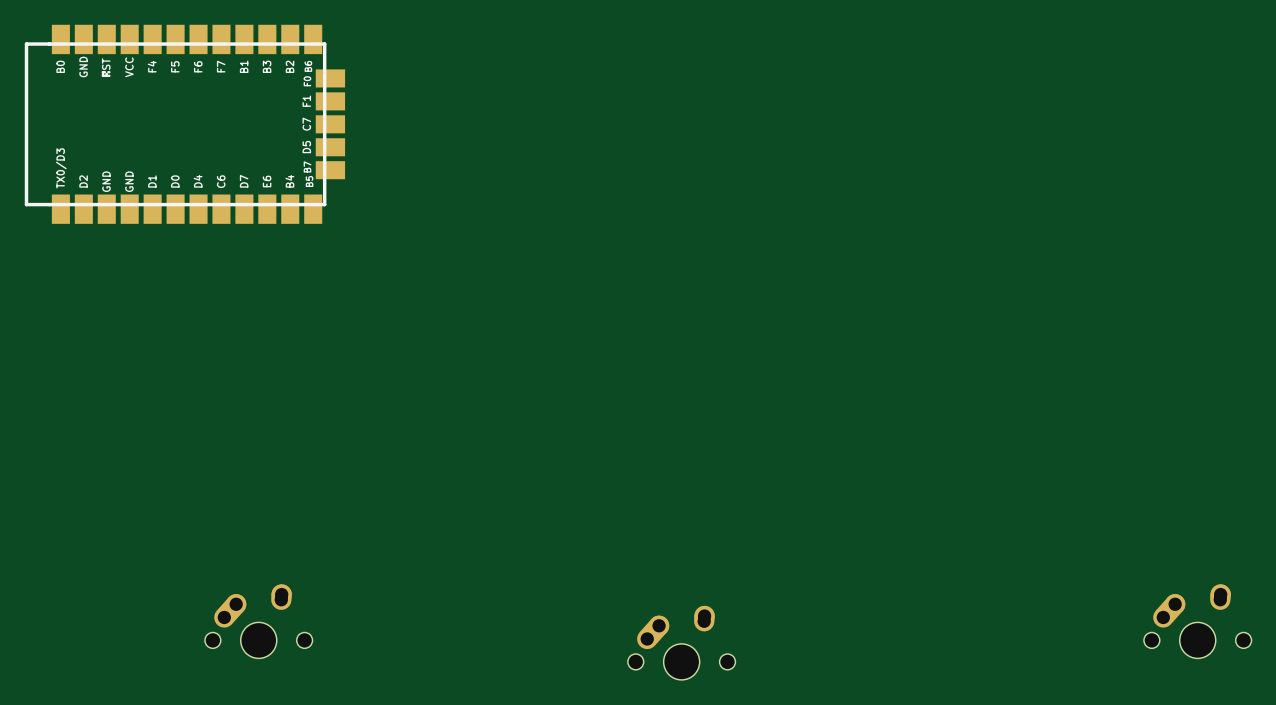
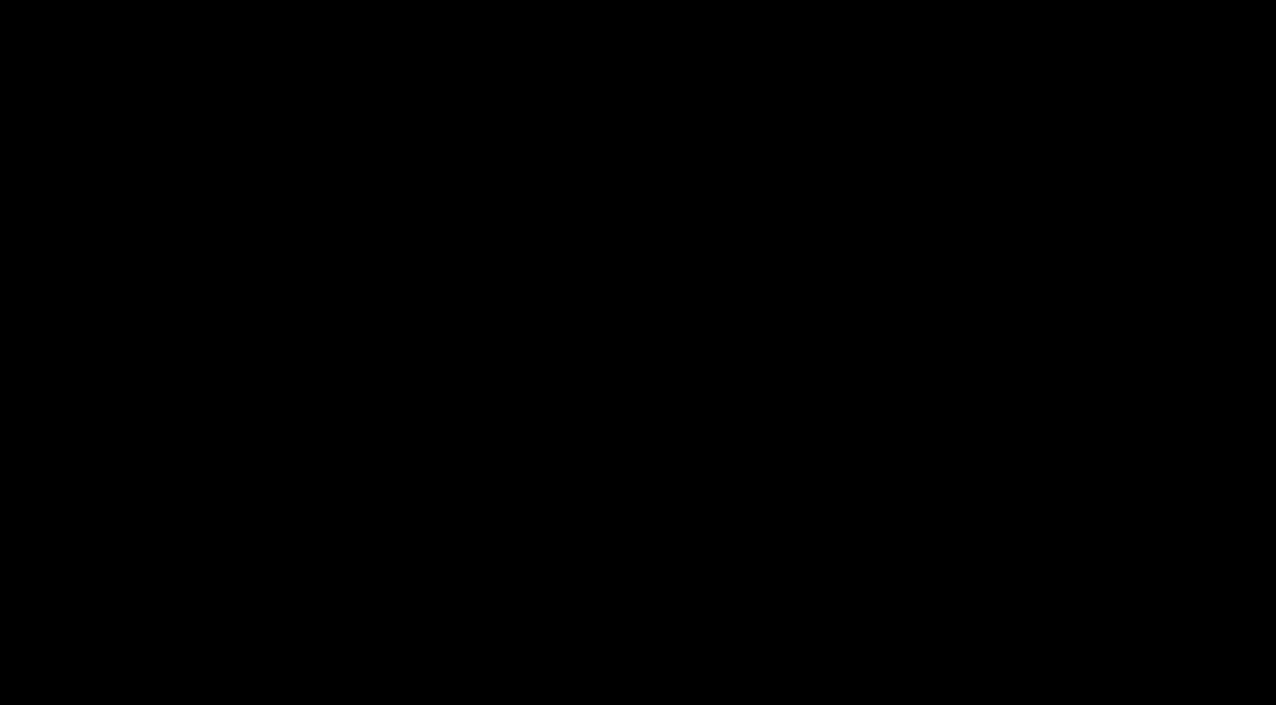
part: (184, 124) -> none
part: (258, 621) -> none
part: (1197, 621) -> none
part: (681, 642) -> none

